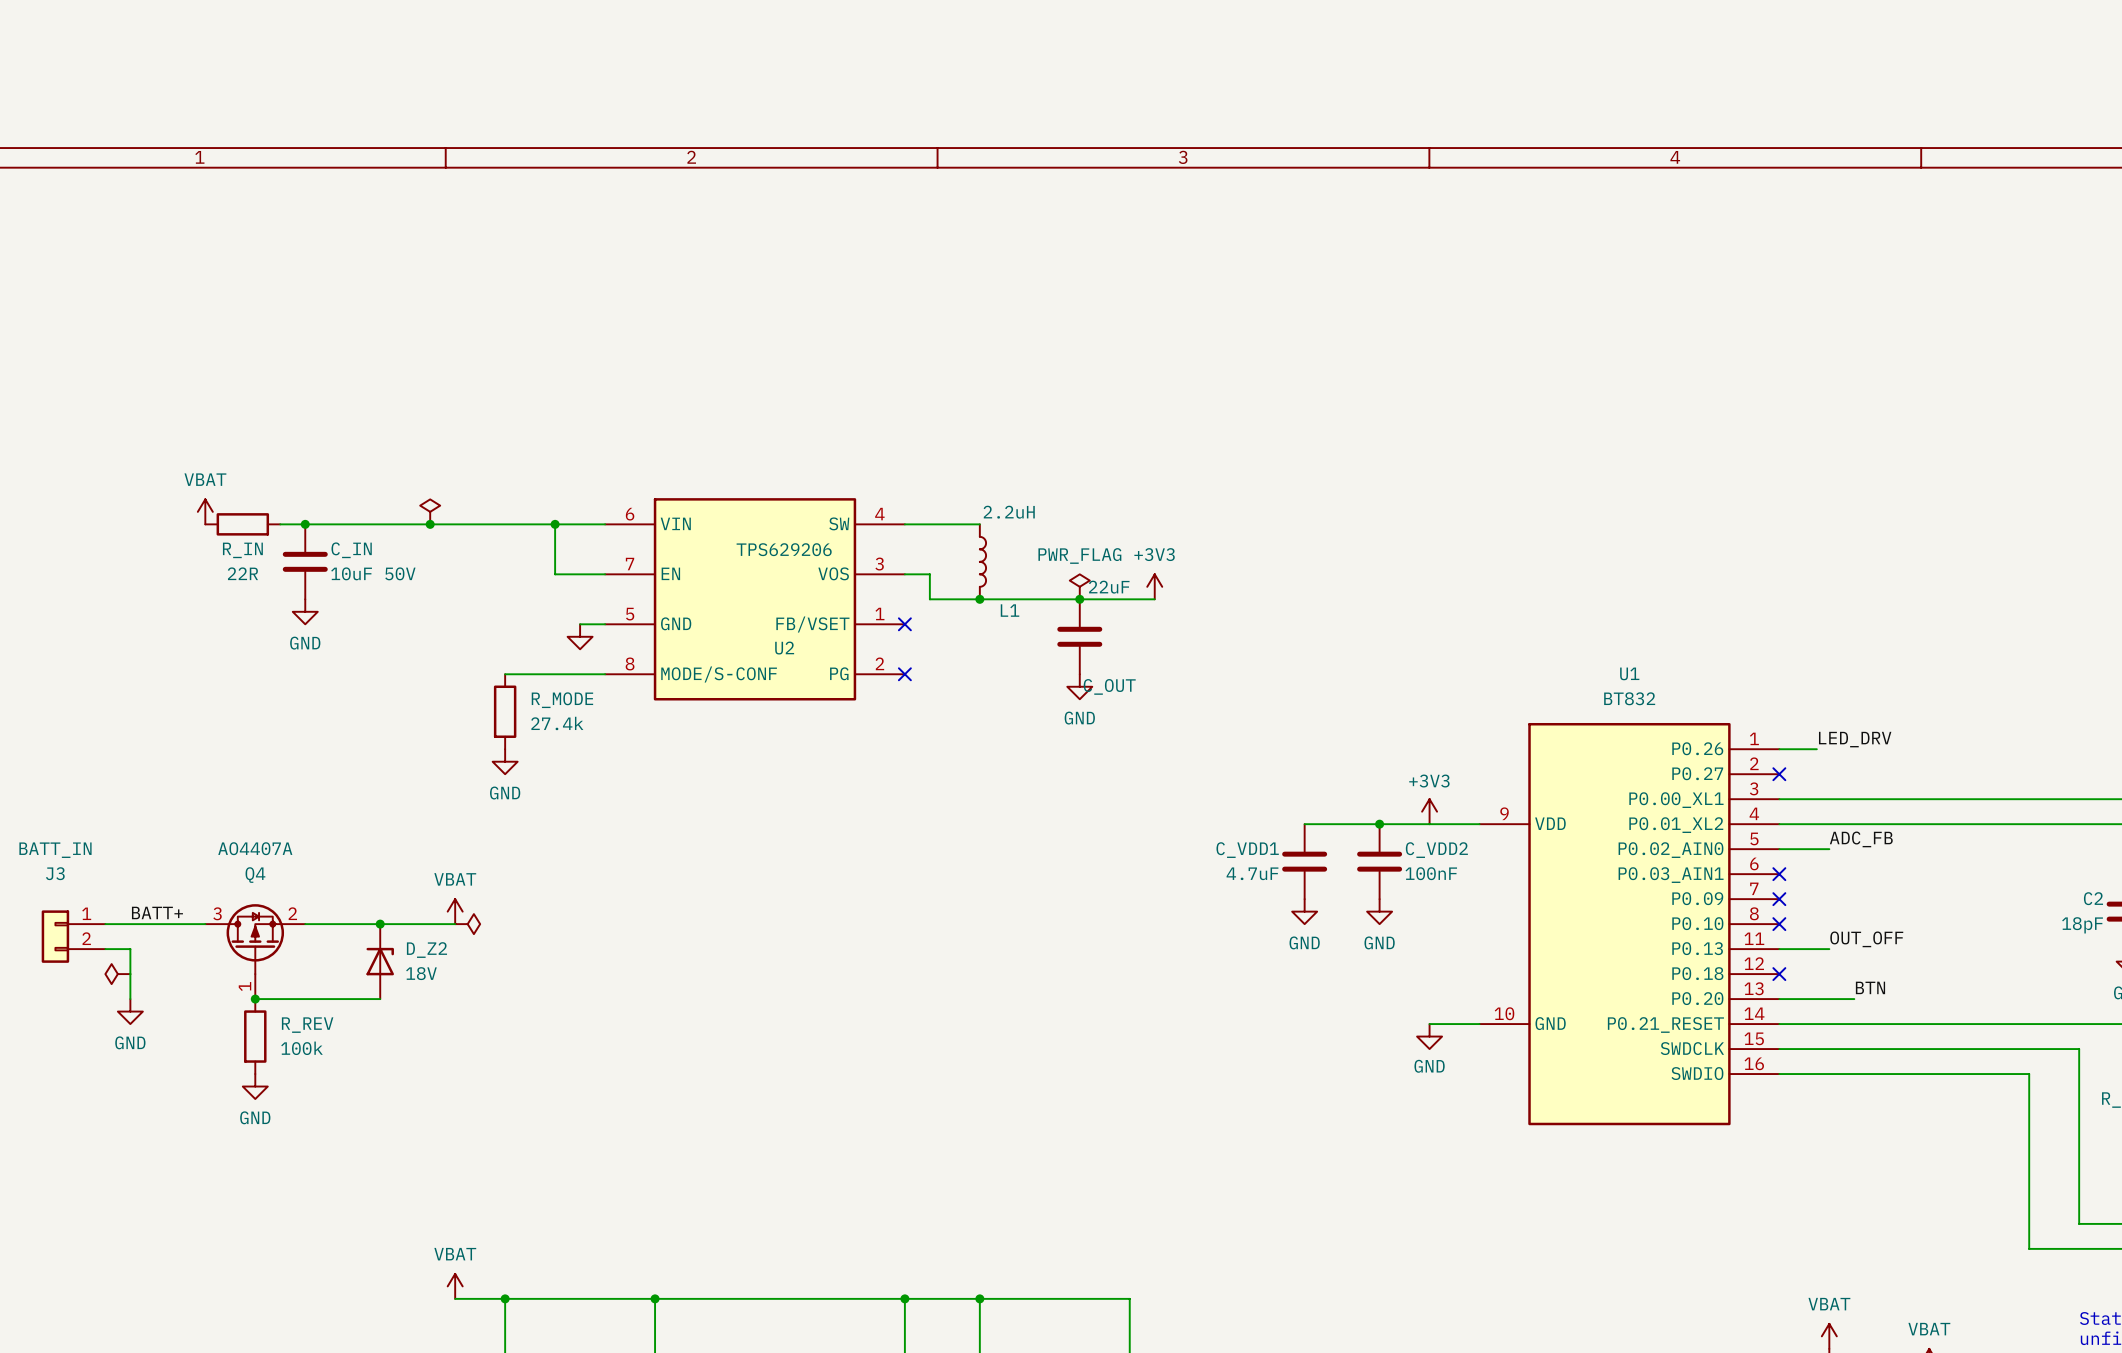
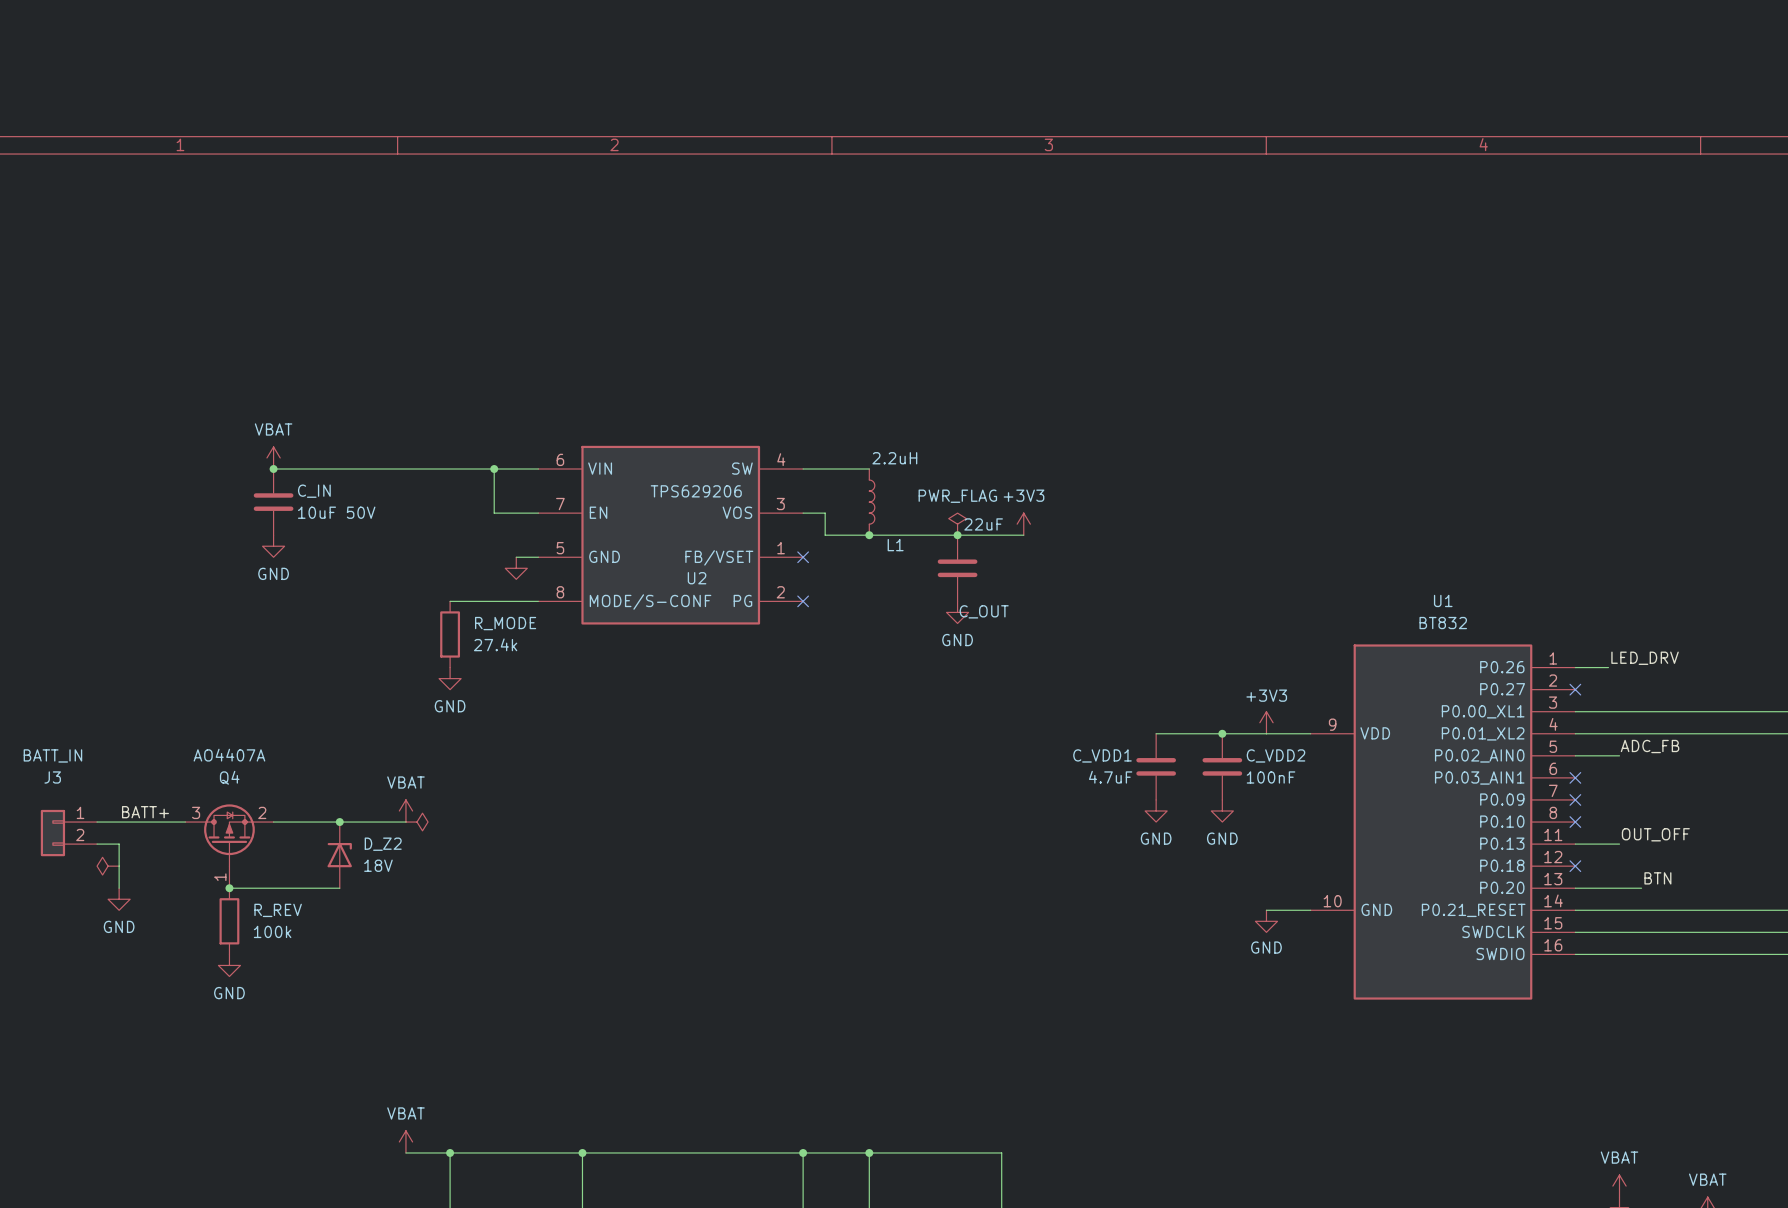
power symbol position: VBAT (205, 511) -> VBAT (273, 457)
power symbol: (430, 511) -> none
R_IN: 22R (242, 524) -> none
wire: (280, 524) (305, 524) -> none
junction: (430, 524) -> none

